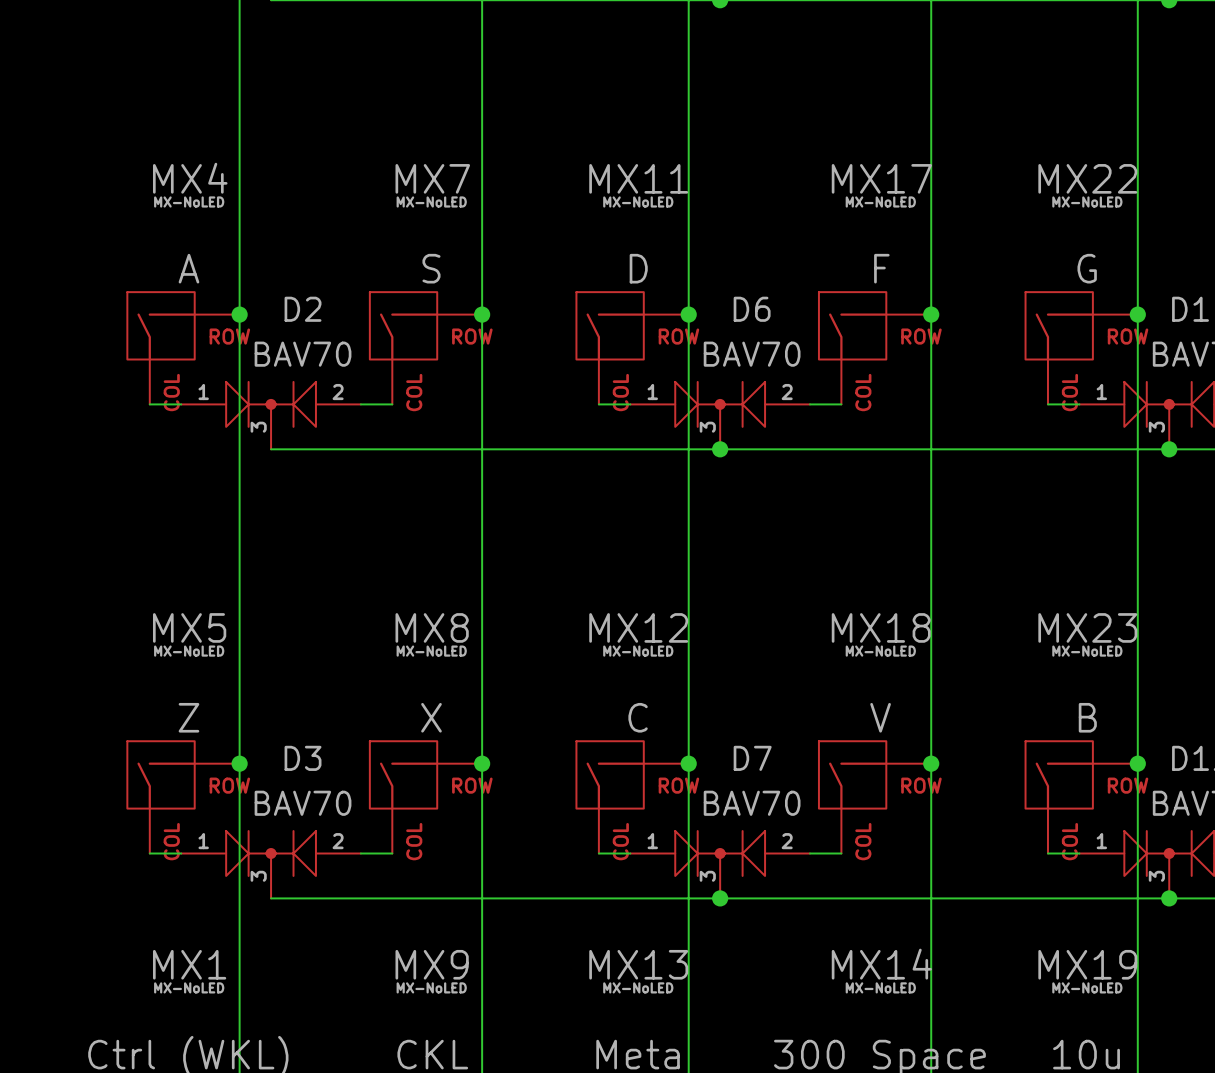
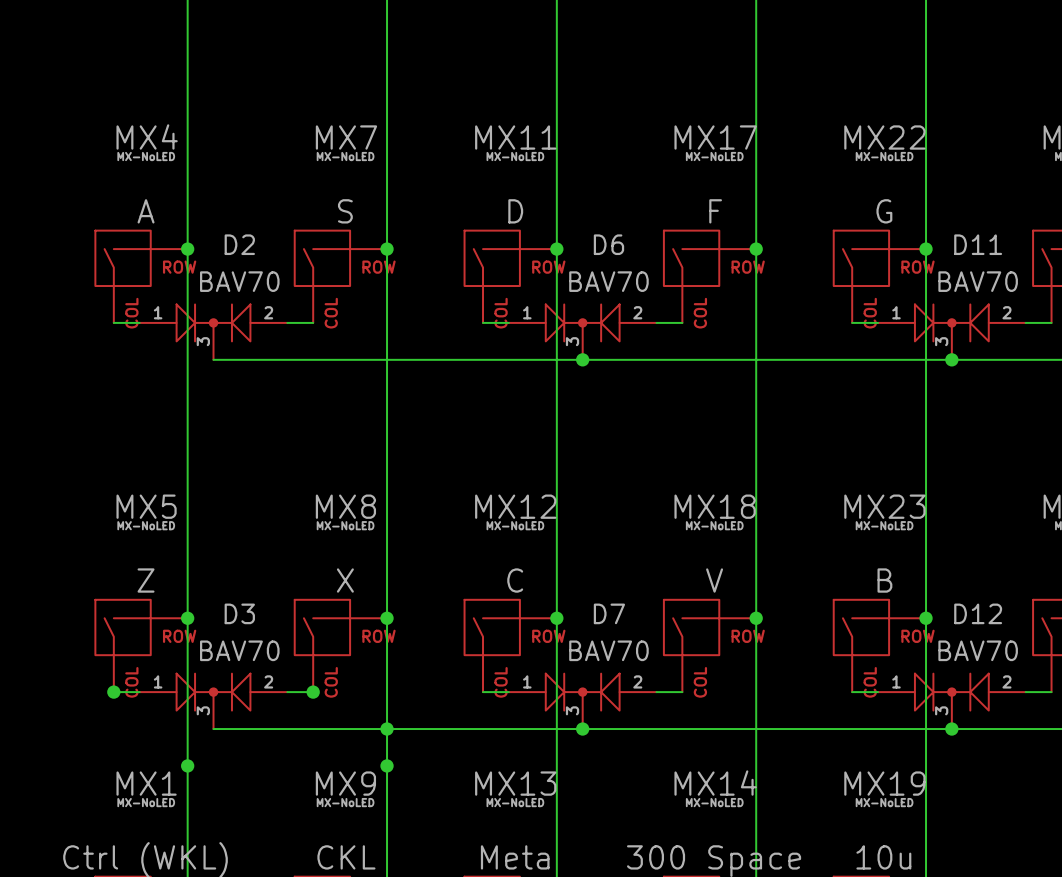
junction: none -> (113, 692)
junction: none -> (313, 692)
junction: none -> (387, 729)
junction: none -> (187, 765)
junction: none -> (387, 765)

